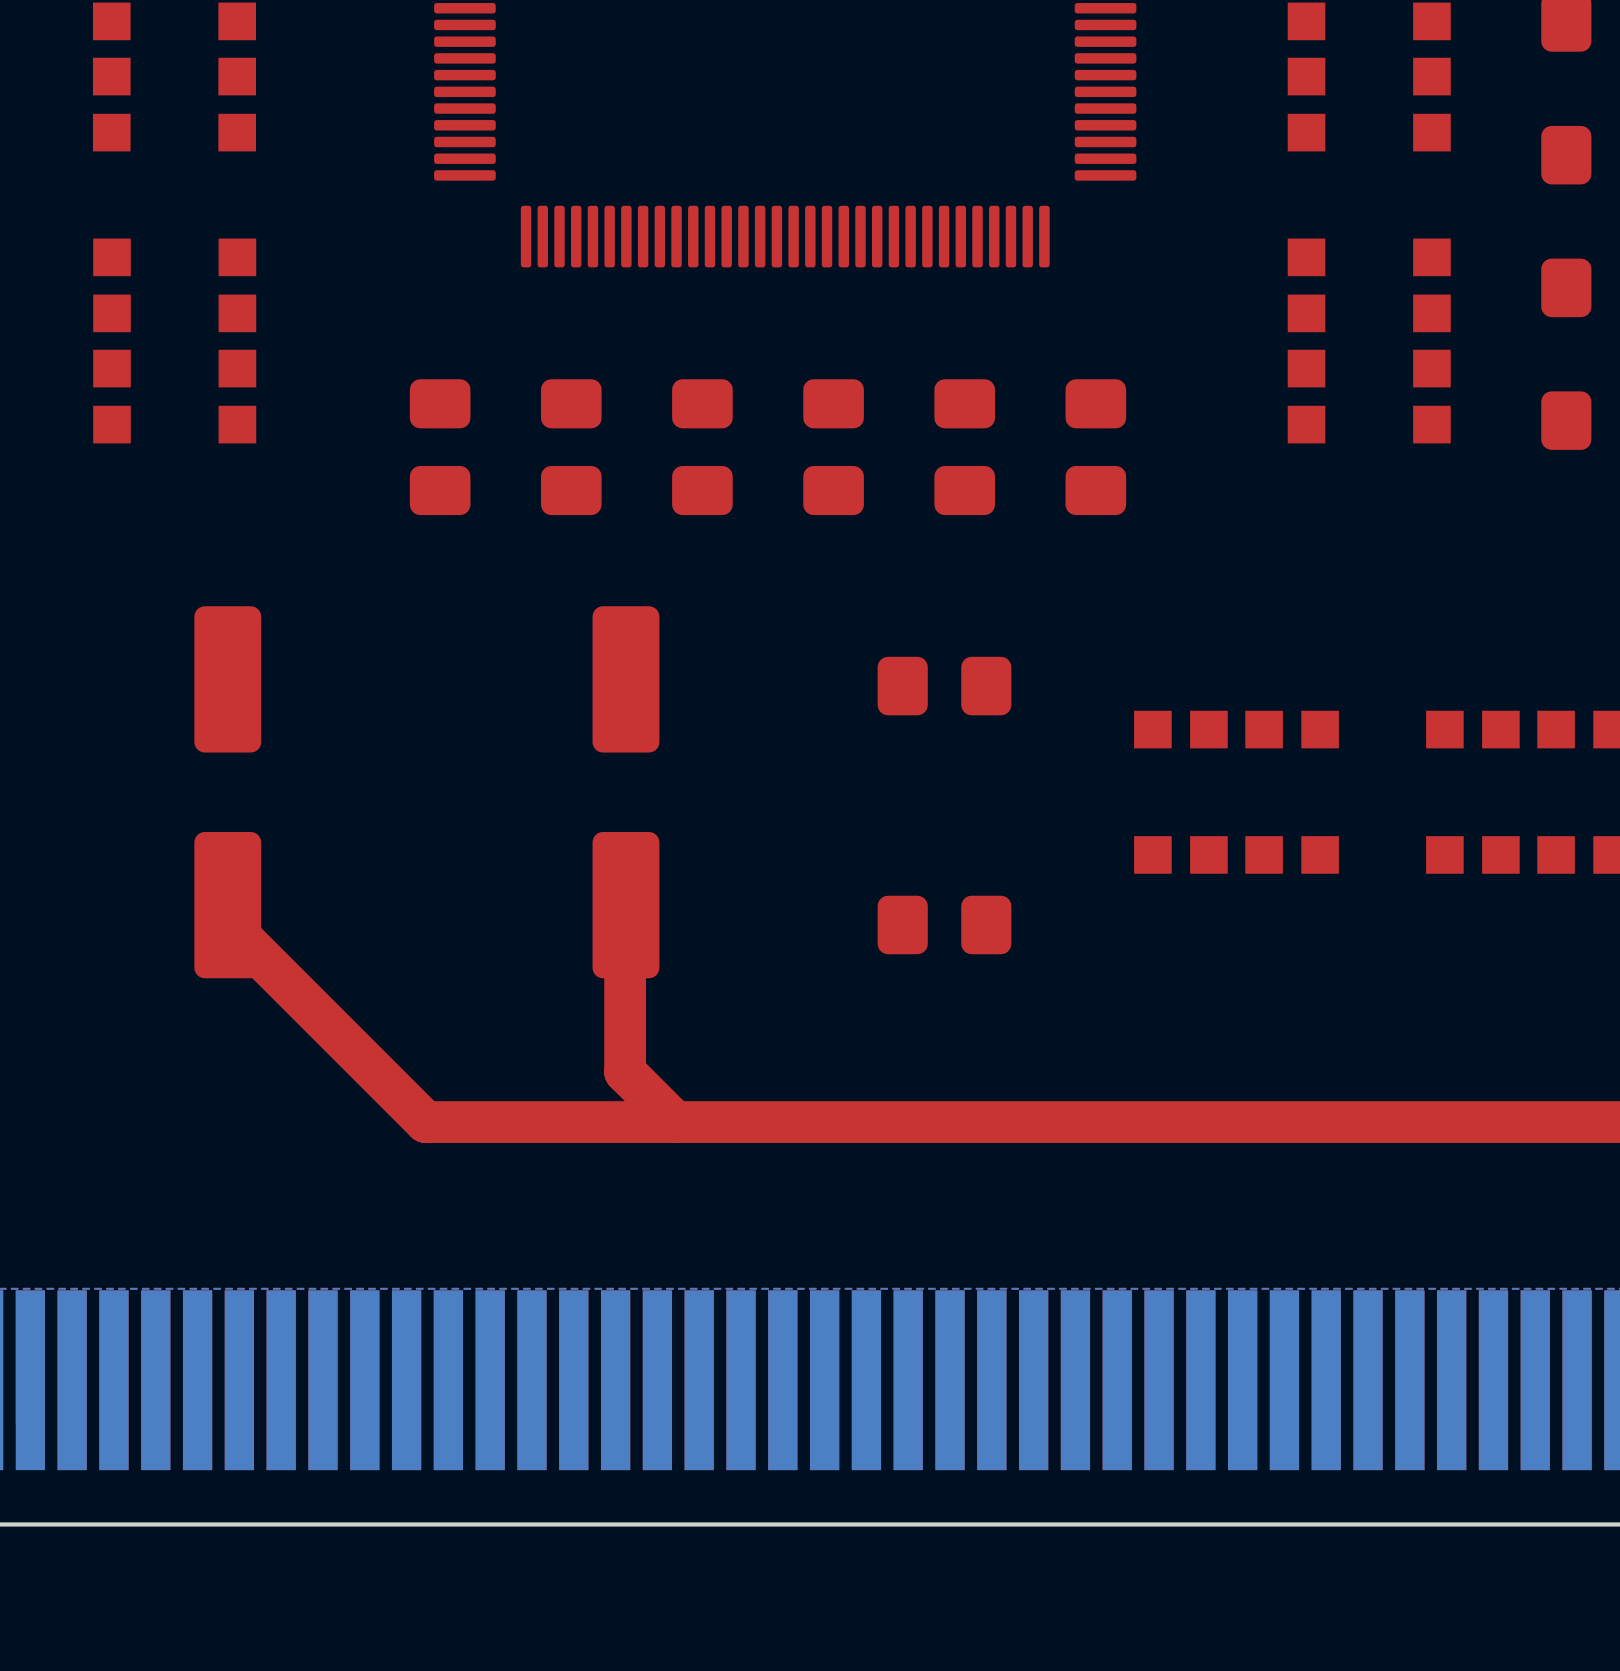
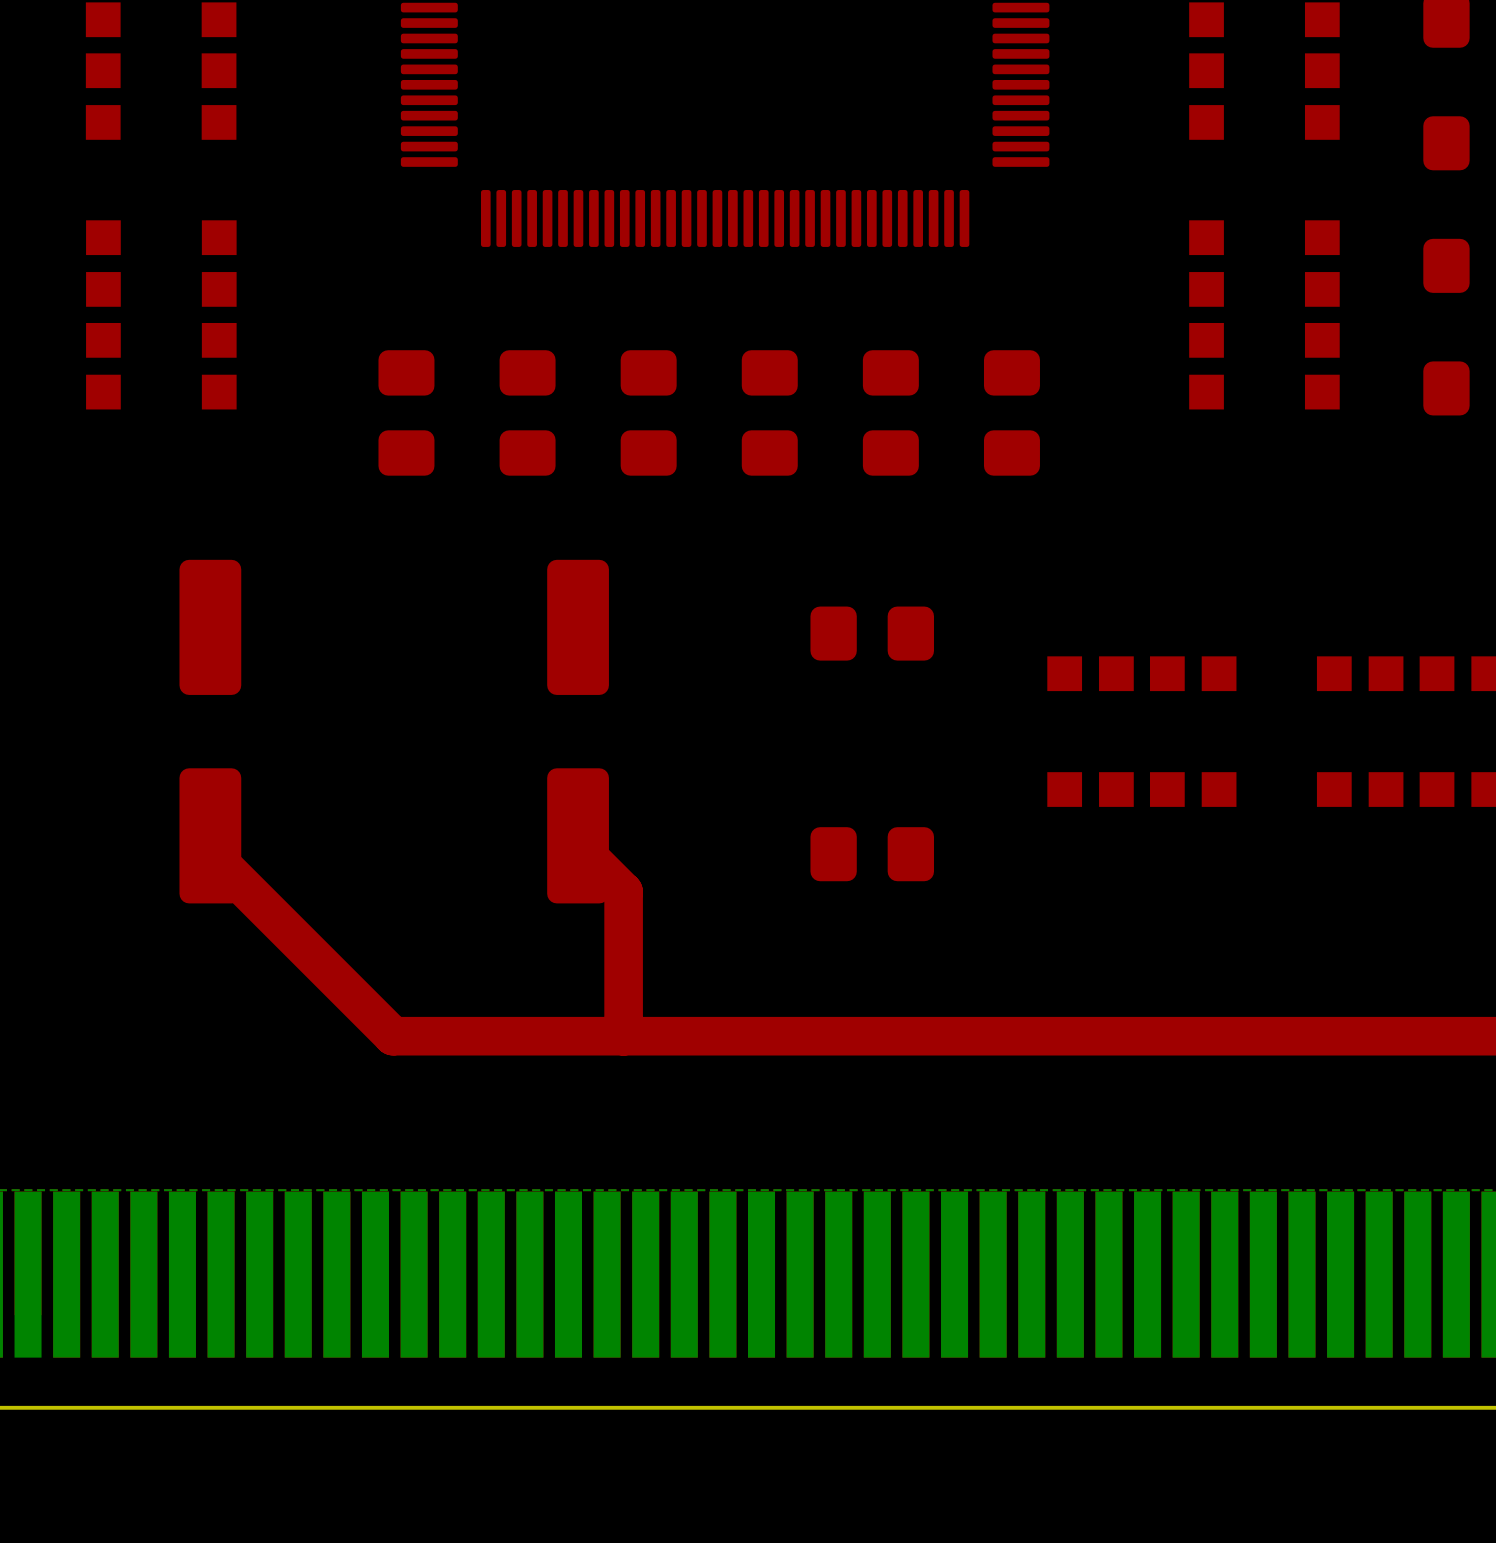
top track: (625, 915) (625, 1071) (675, 1122) -> (577, 845) (623, 891) (623, 1036)

